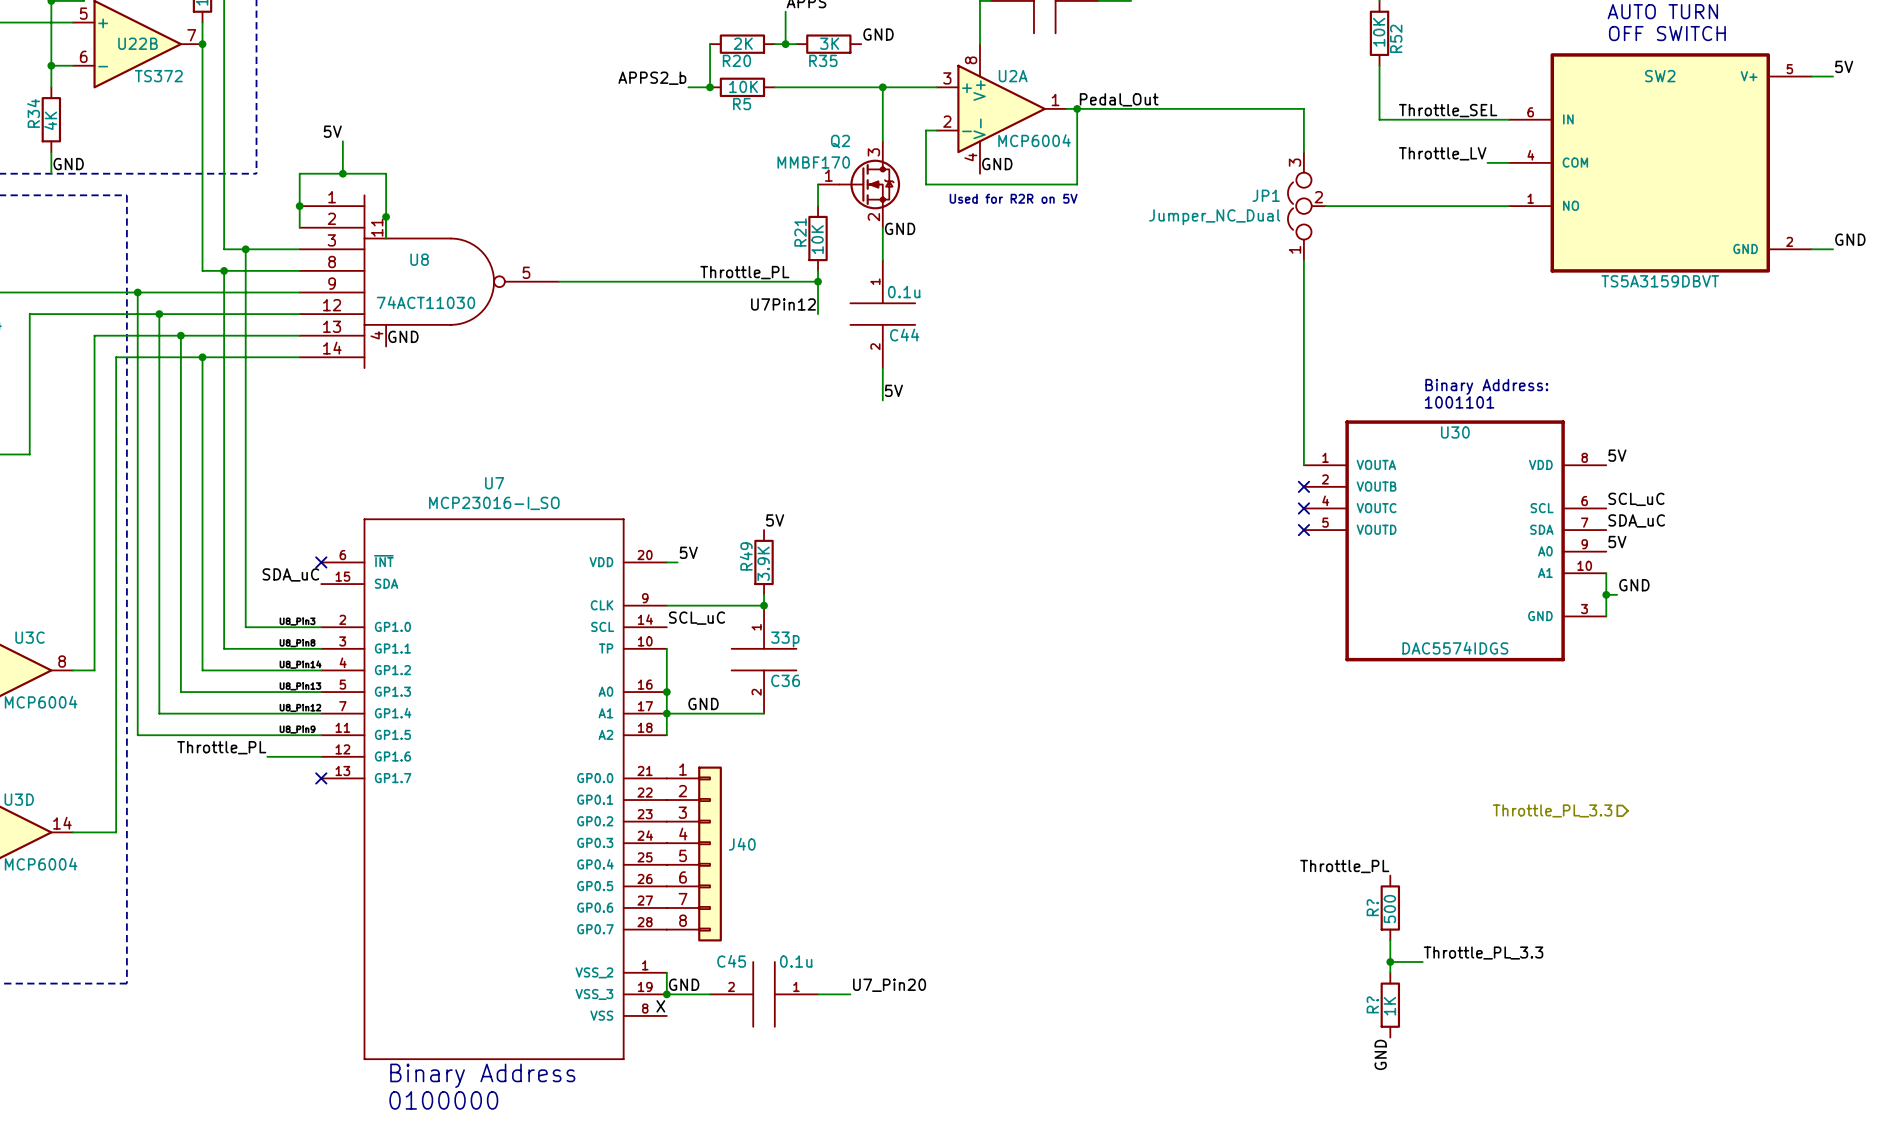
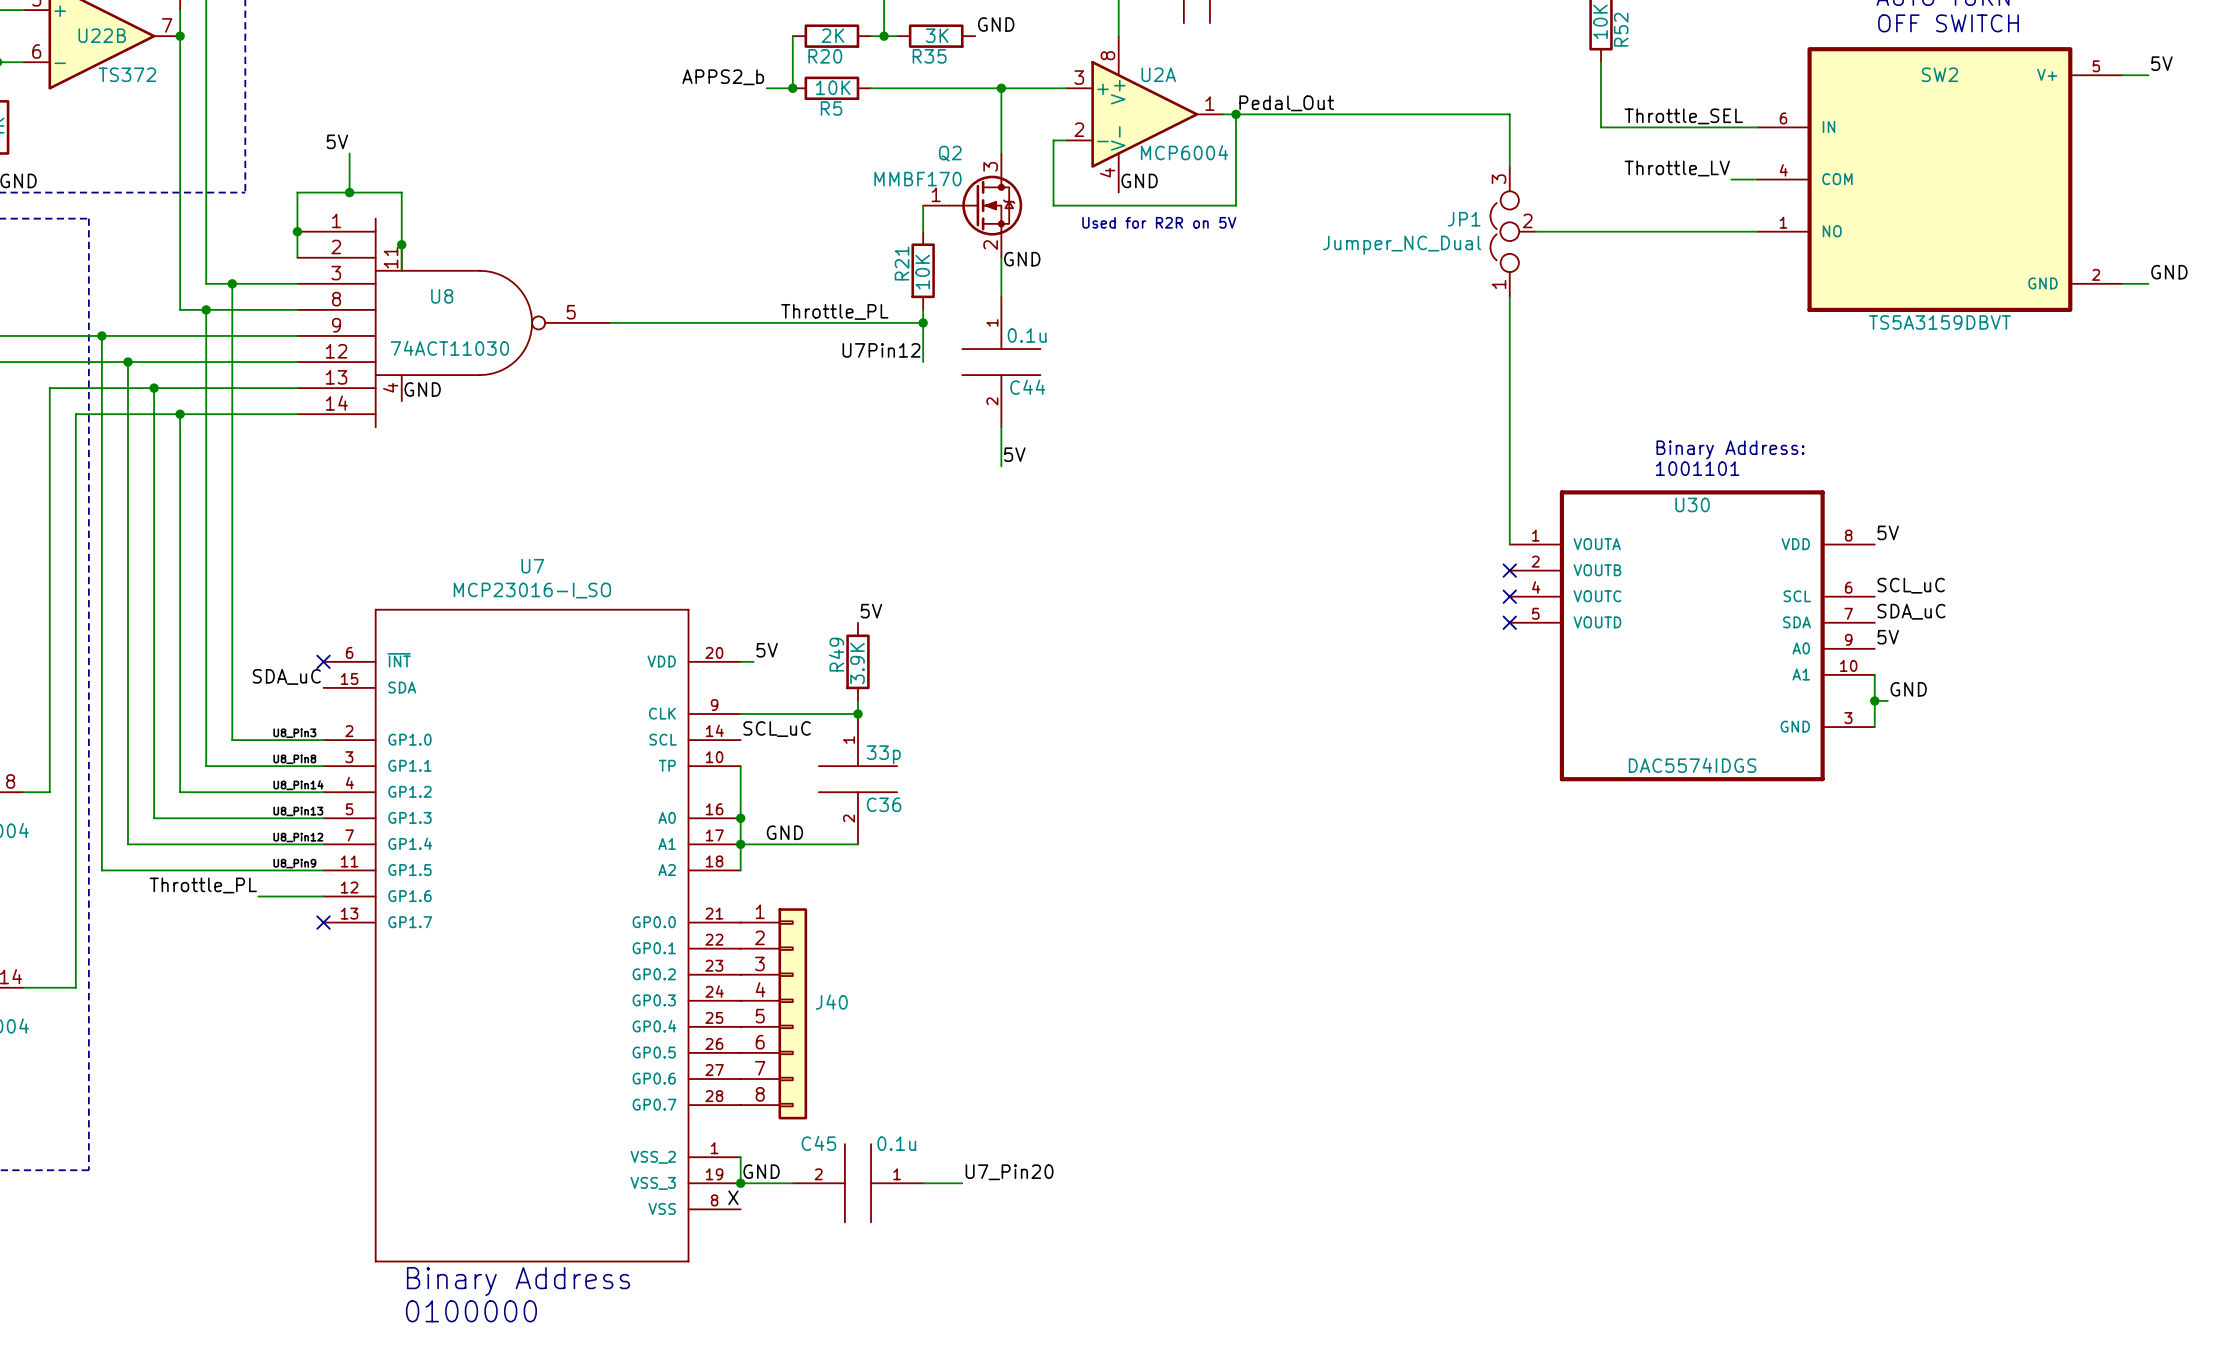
hierarchical label: Throttle_PL_3.3 (1552, 810) -> none
label: Throttle_PL (1344, 866) -> none
R?: 500 (1390, 908) -> none
wire: (1390, 940) (1390, 972) -> none
label: Throttle_PL_3.3 (1483, 953) -> none
wire: (1390, 961) (1422, 961) -> none
junction: (1390, 961) -> none
R?: 1K (1390, 1005) -> none
label: GND (1380, 1054) -> none

